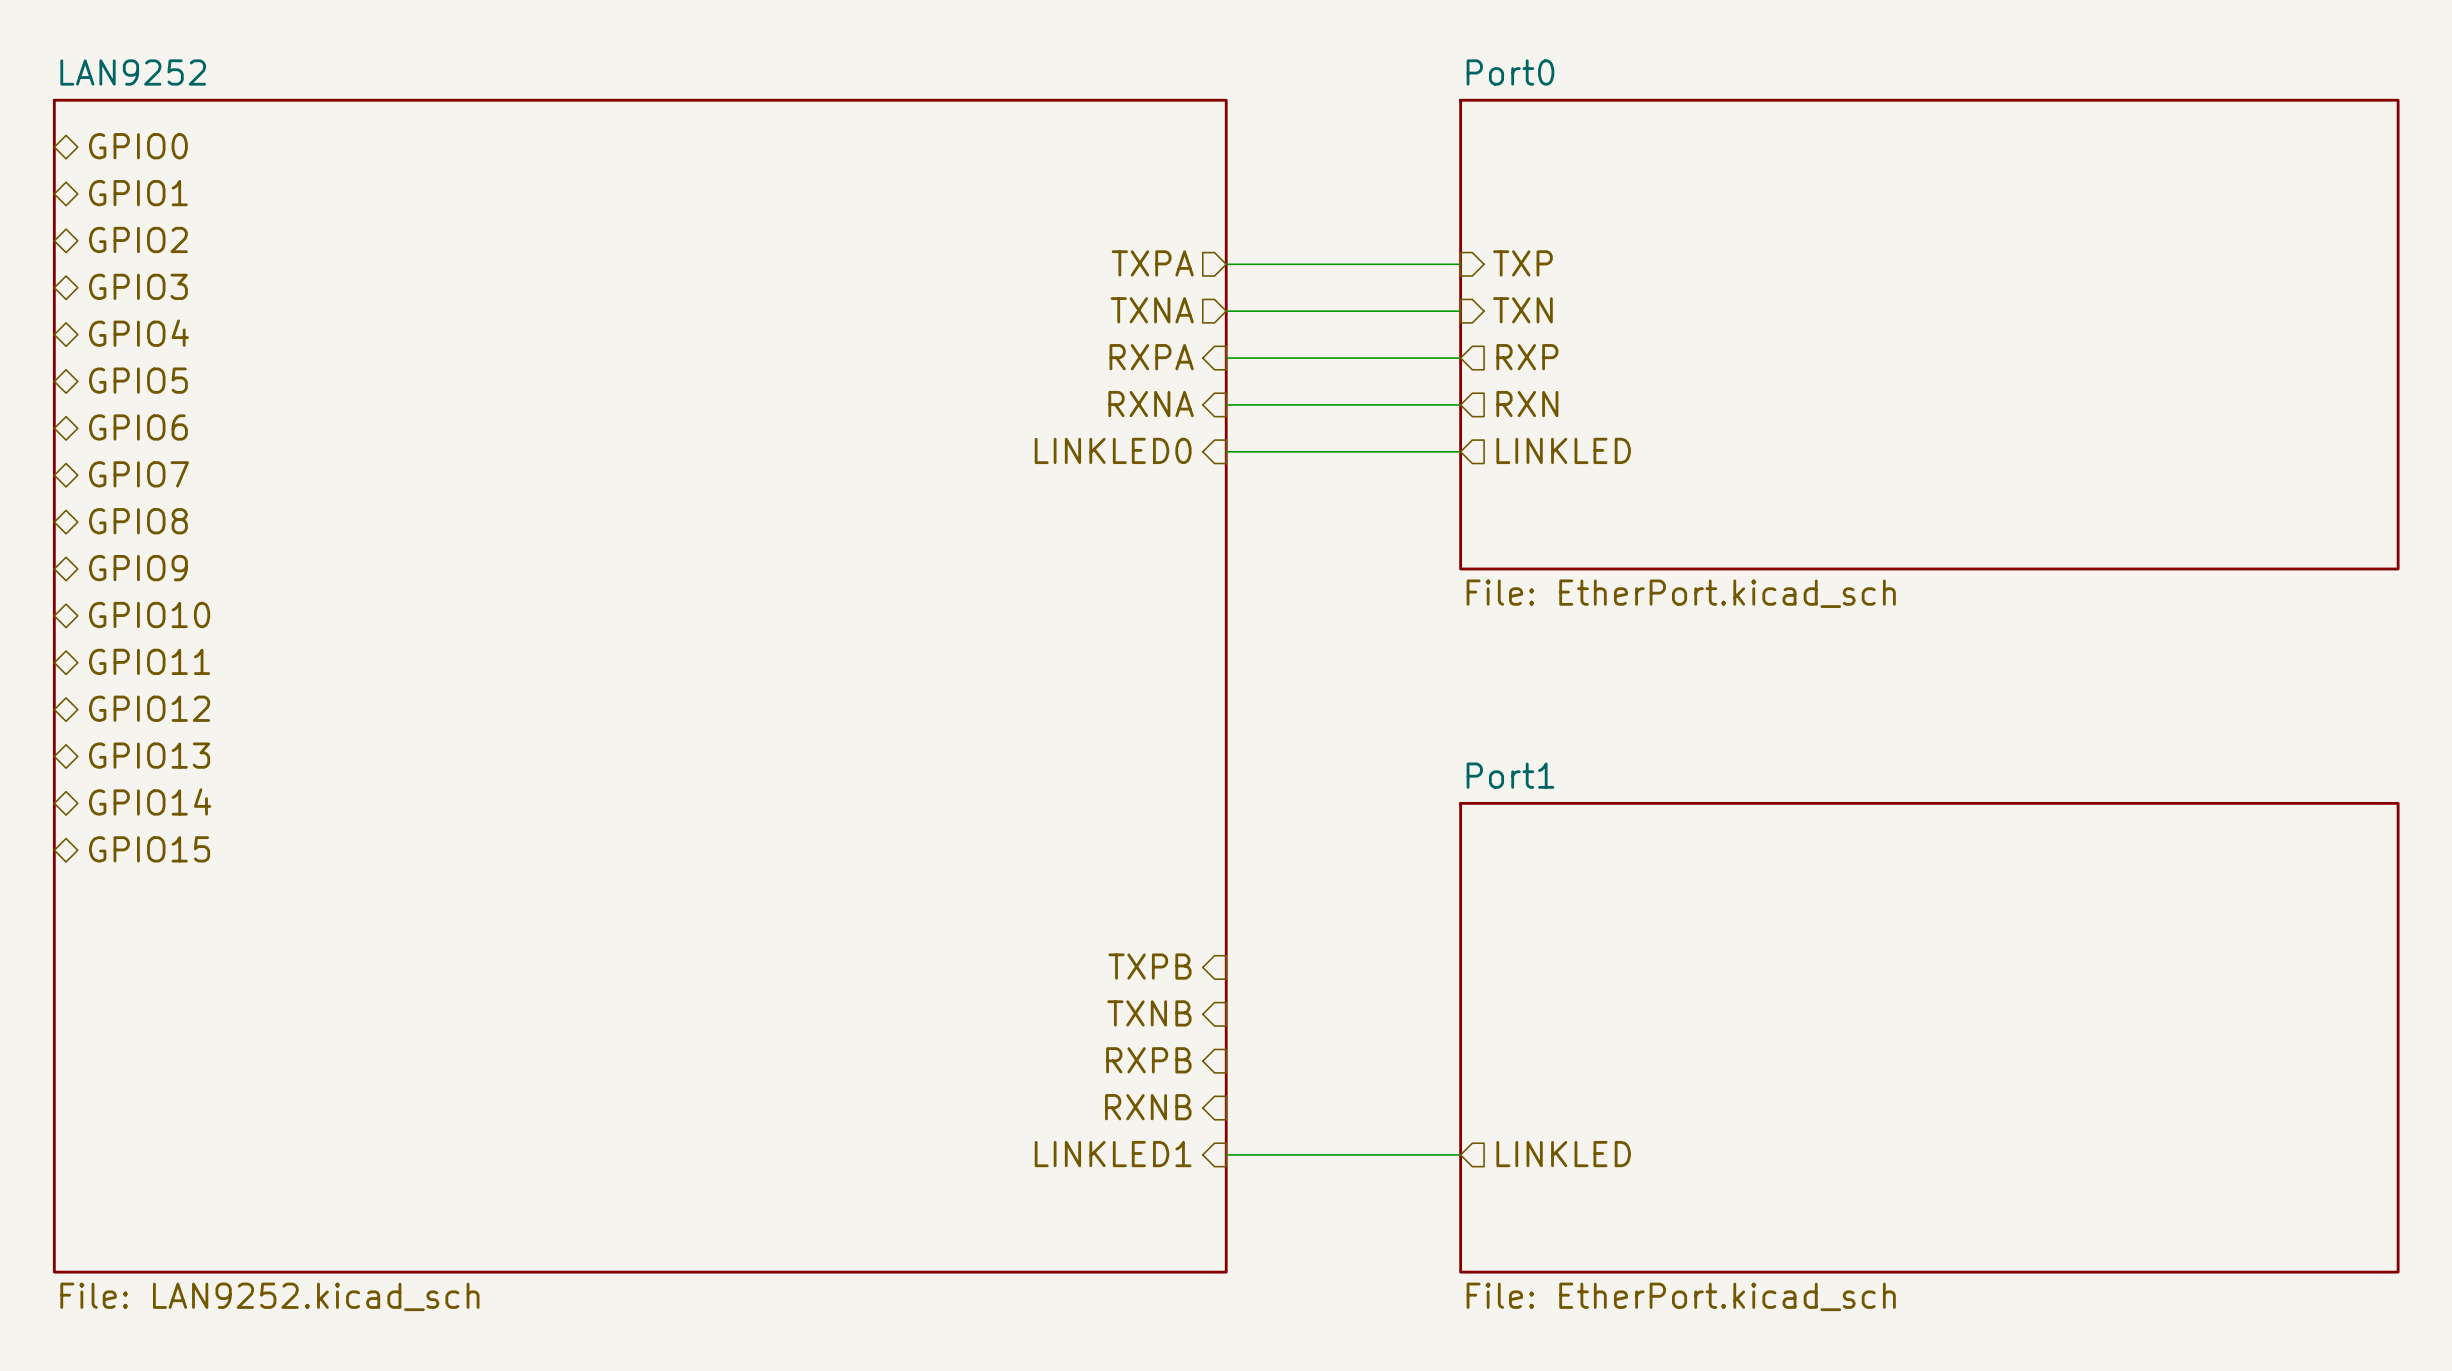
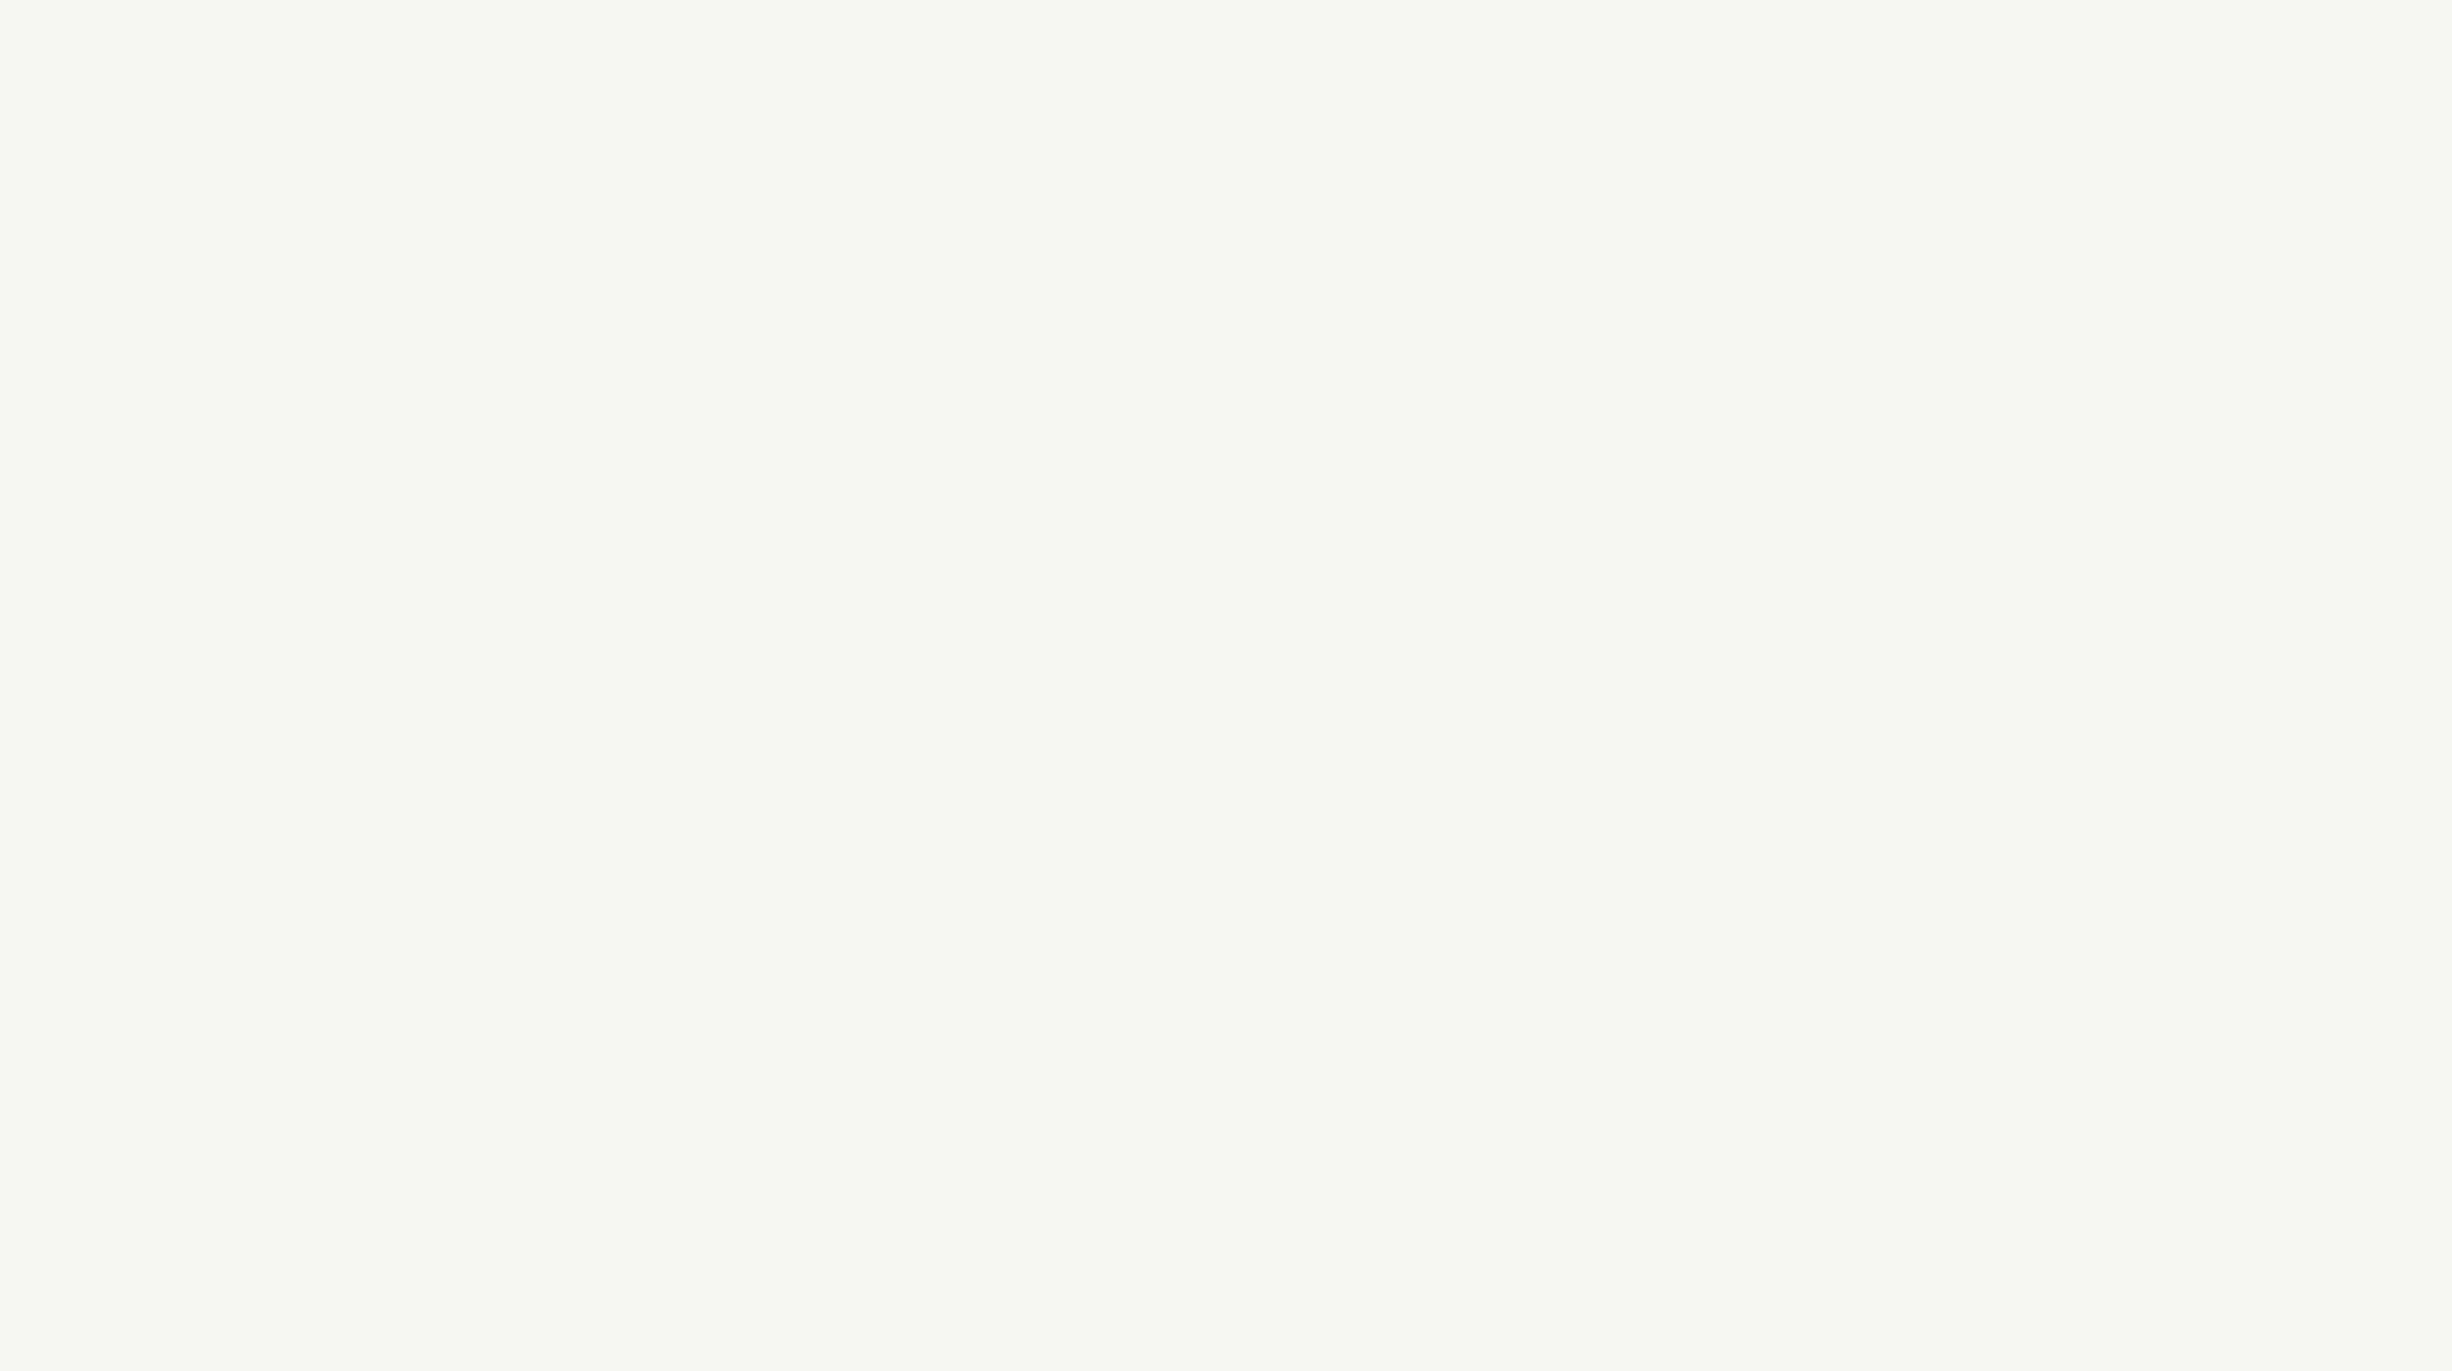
hierarchical label: GPIO0 (138, 146) -> none
hierarchical label: GPIO1 (138, 193) -> none
hierarchical label: GPIO2 (138, 239) -> none
hierarchical label: TXPA (1152, 263) -> none
hierarchical label: TXP (1522, 263) -> none
wire: (1226, 264) (1460, 264) -> none
hierarchical label: GPIO3 (138, 286) -> none
hierarchical label: TXNA (1152, 310) -> none
hierarchical label: TXN (1522, 310) -> none
wire: (1226, 311) (1460, 311) -> none
hierarchical label: GPIO4 (138, 333) -> none
sheet Port0: File: EtherPort.kicad_sch (1929, 334) -> none
hierarchical label: RXPA (1151, 357) -> none
hierarchical label: RXP (1527, 357) -> none
wire: (1226, 358) (1460, 358) -> none
hierarchical label: GPIO5 (138, 380) -> none
hierarchical label: RXNA (1151, 404) -> none
wire: (1226, 404) (1460, 404) -> none
hierarchical label: RXN (1527, 404) -> none
hierarchical label: GPIO6 (138, 427) -> none
hierarchical label: LINKLED0 (1113, 450) -> none
hierarchical label: LINKLED (1563, 450) -> none
wire: (1226, 451) (1460, 451) -> none
hierarchical label: GPIO7 (138, 474) -> none
hierarchical label: GPIO8 (138, 521) -> none
hierarchical label: GPIO9 (138, 568) -> none
hierarchical label: GPIO10 (149, 614) -> none
hierarchical label: GPIO11 (149, 661) -> none
sheet LAN9252: File: LAN9252.kicad_sch (640, 686) -> none
hierarchical label: GPIO12 (149, 708) -> none
hierarchical label: GPIO13 (149, 755) -> none
hierarchical label: GPIO14 (150, 801) -> none
hierarchical label: GPIO15 (149, 849) -> none
hierarchical label: TXPB (1149, 966) -> none
hierarchical label: TXNB (1149, 1013) -> none
sheet Port1: File: EtherPort.kicad_sch (1929, 1037) -> none
hierarchical label: RXPB (1148, 1060) -> none
hierarchical label: RXNB (1148, 1107) -> none
hierarchical label: LINKLED1 (1113, 1154) -> none
wire: (1226, 1154) (1460, 1154) -> none
hierarchical label: LINKLED (1563, 1154) -> none

